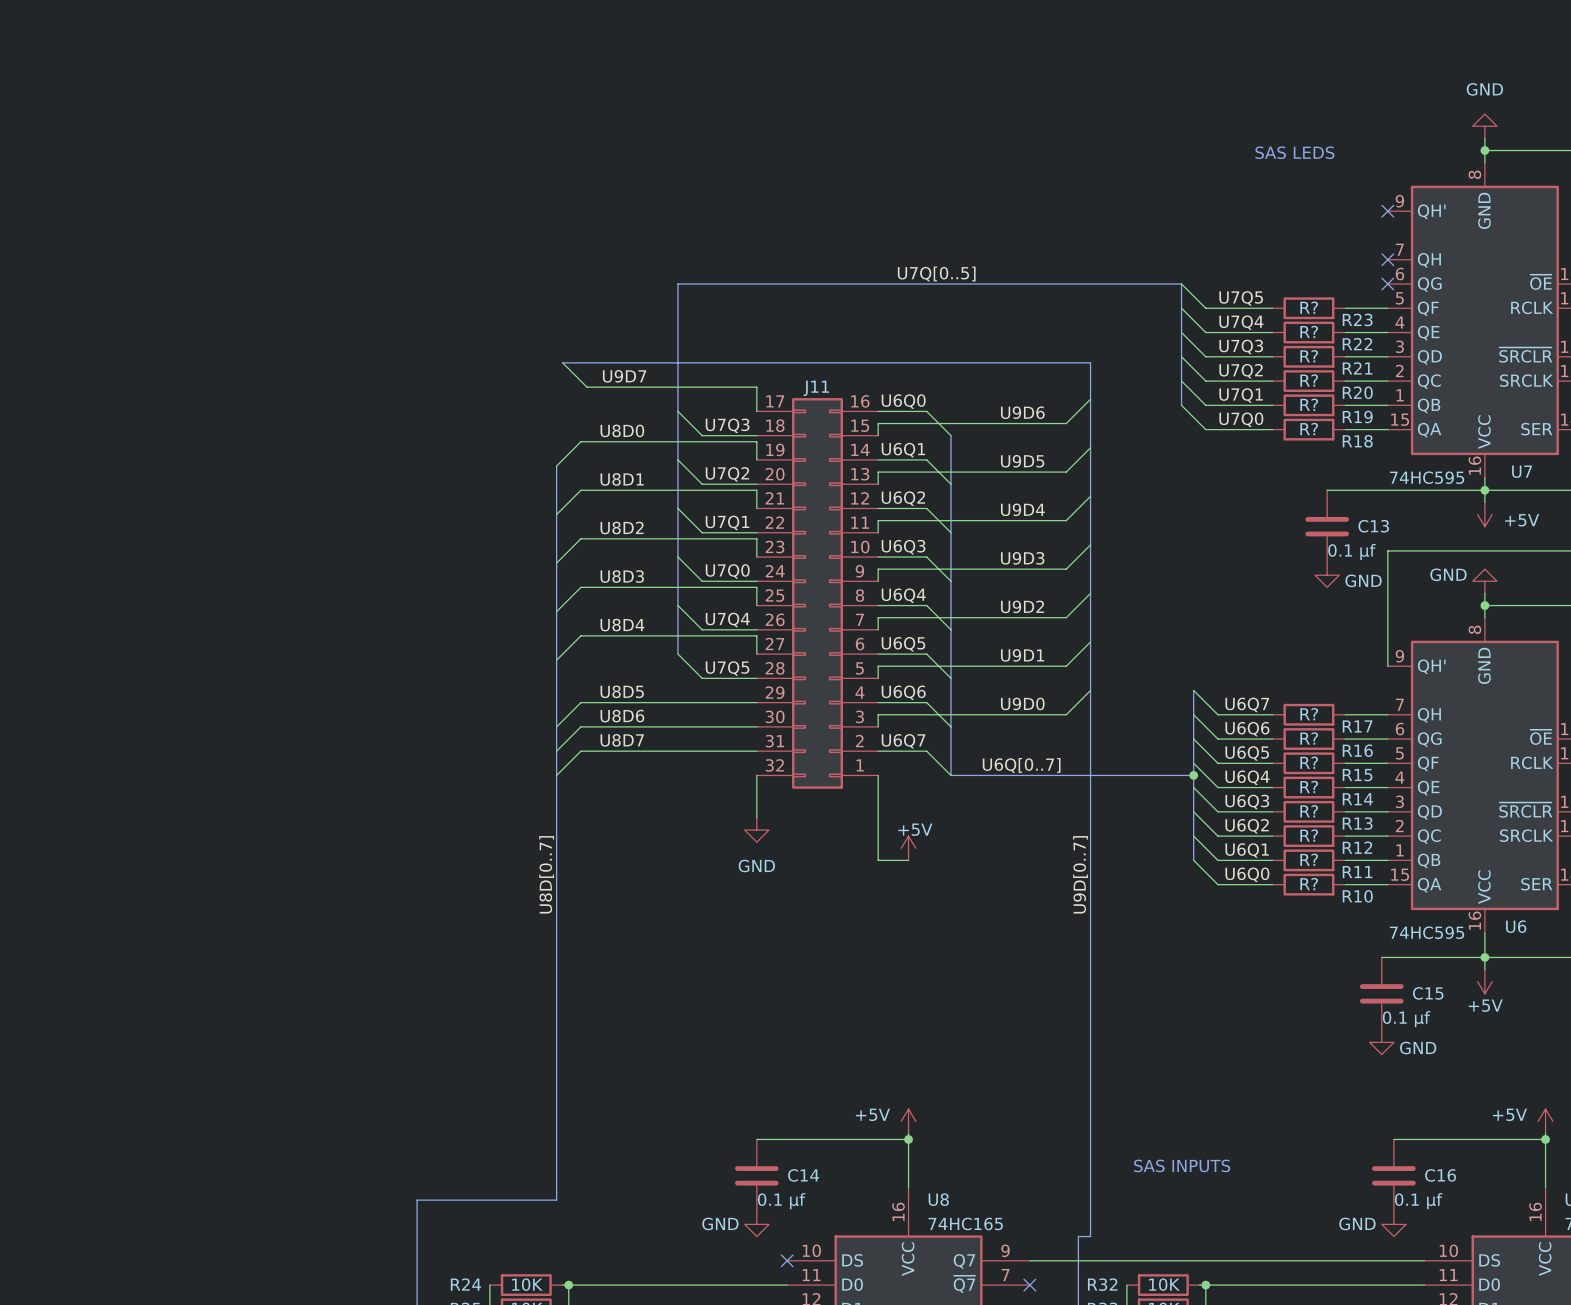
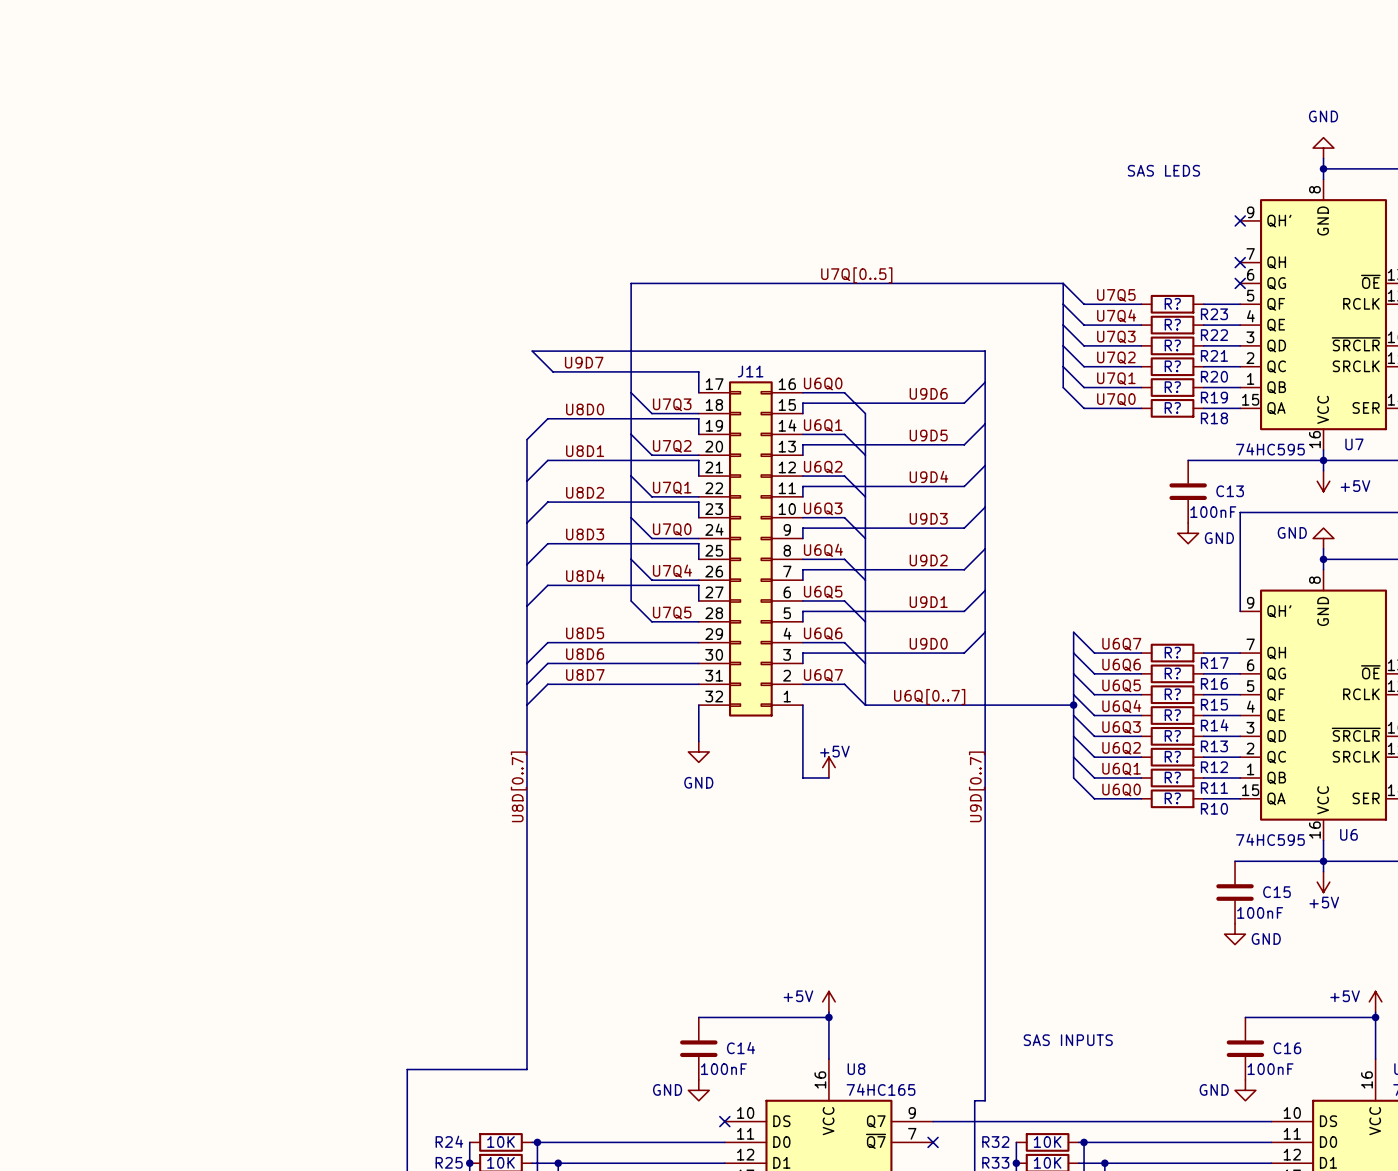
C13 value: 0.1 µf (1351, 551) -> 100nF (1213, 512)
C15 value: 0.1 µf (1406, 1019) -> 100nF (1260, 912)
C14 value: 0.1 µf (781, 1201) -> 100nF (723, 1069)
C16 value: 0.1 µf (1418, 1201) -> 100nF (1270, 1069)

